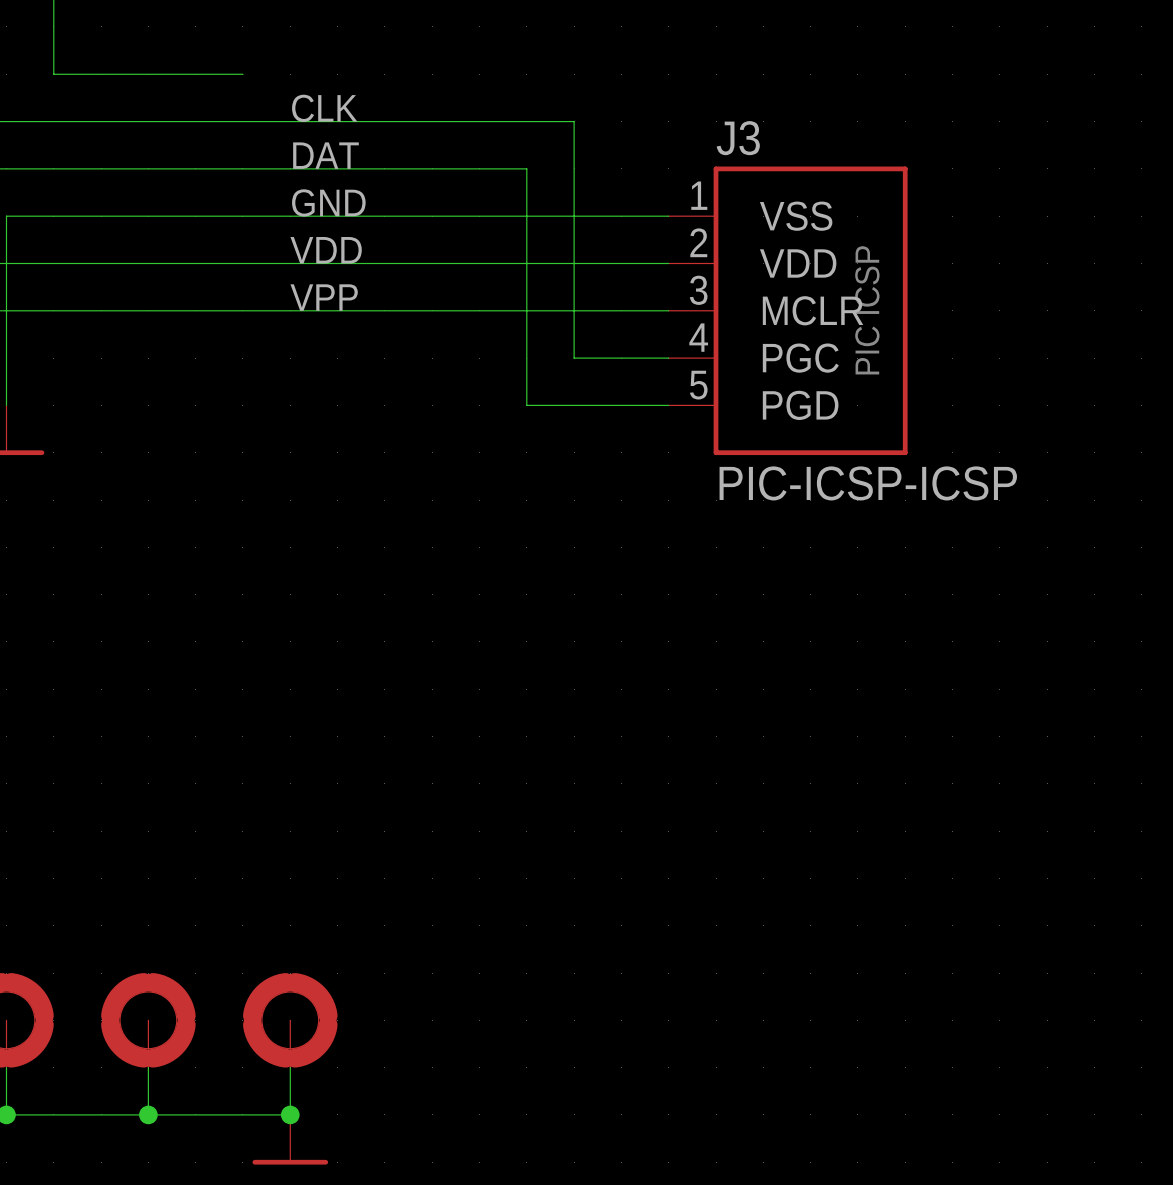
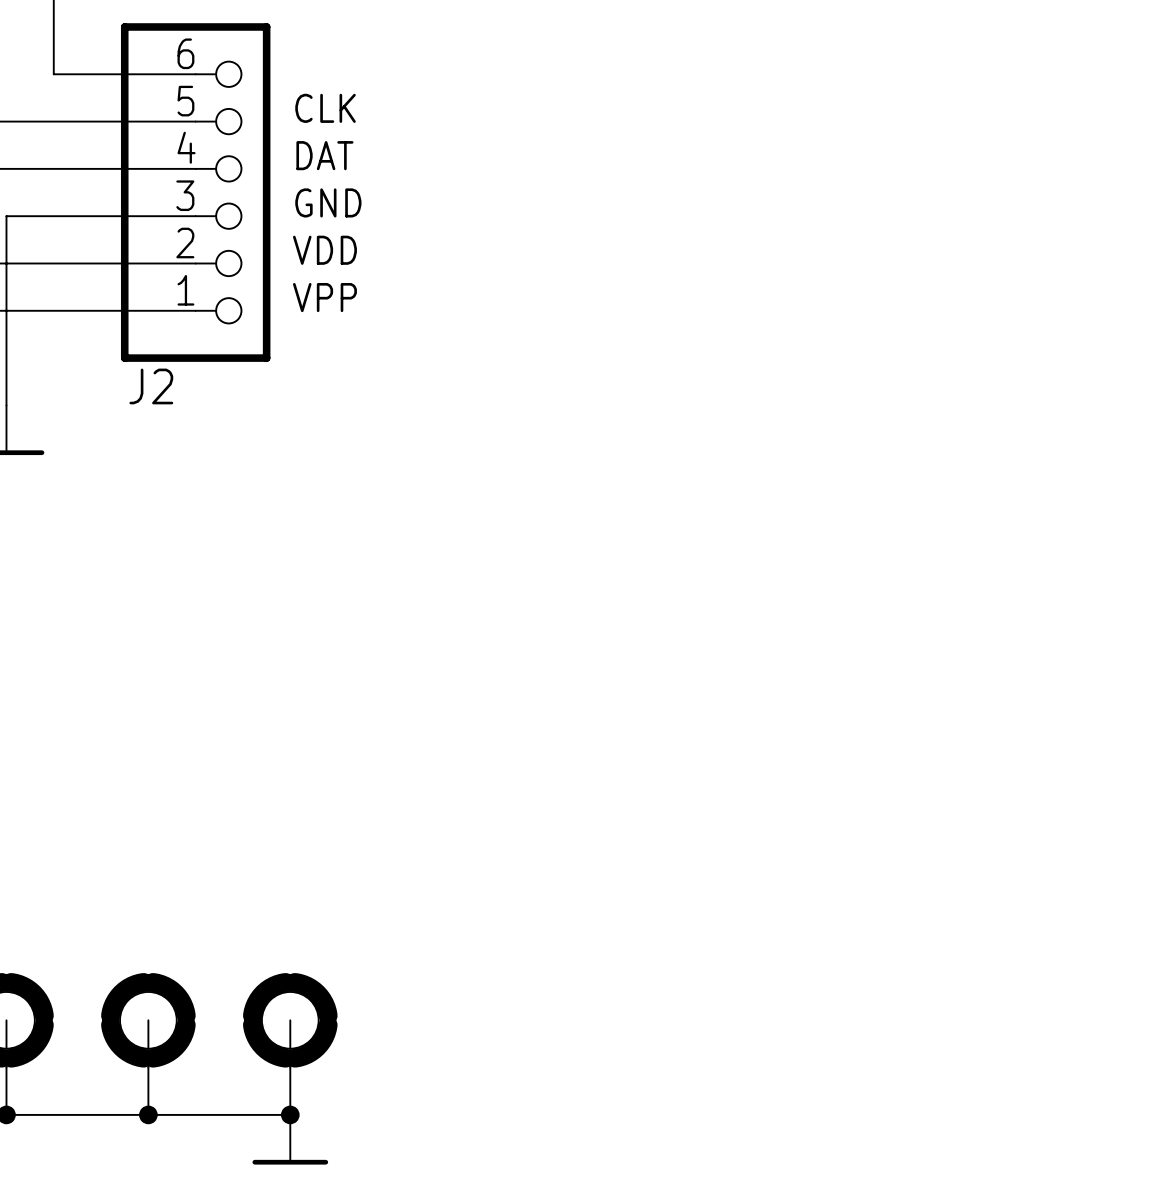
wire: (195, 74) (242, 74) -> none
wire: (195, 121) (574, 121) (574, 358) (668, 358) -> none
wire: (195, 168) (526, 168) (526, 405) (668, 405) -> none
J2: none -> (195, 192)
wire: (195, 216) (668, 216) -> none
wire: (195, 263) (668, 263) -> none
wire: (195, 310) (668, 310) -> none
J3: PIC-ICSP-ICSP (788, 310) -> none

